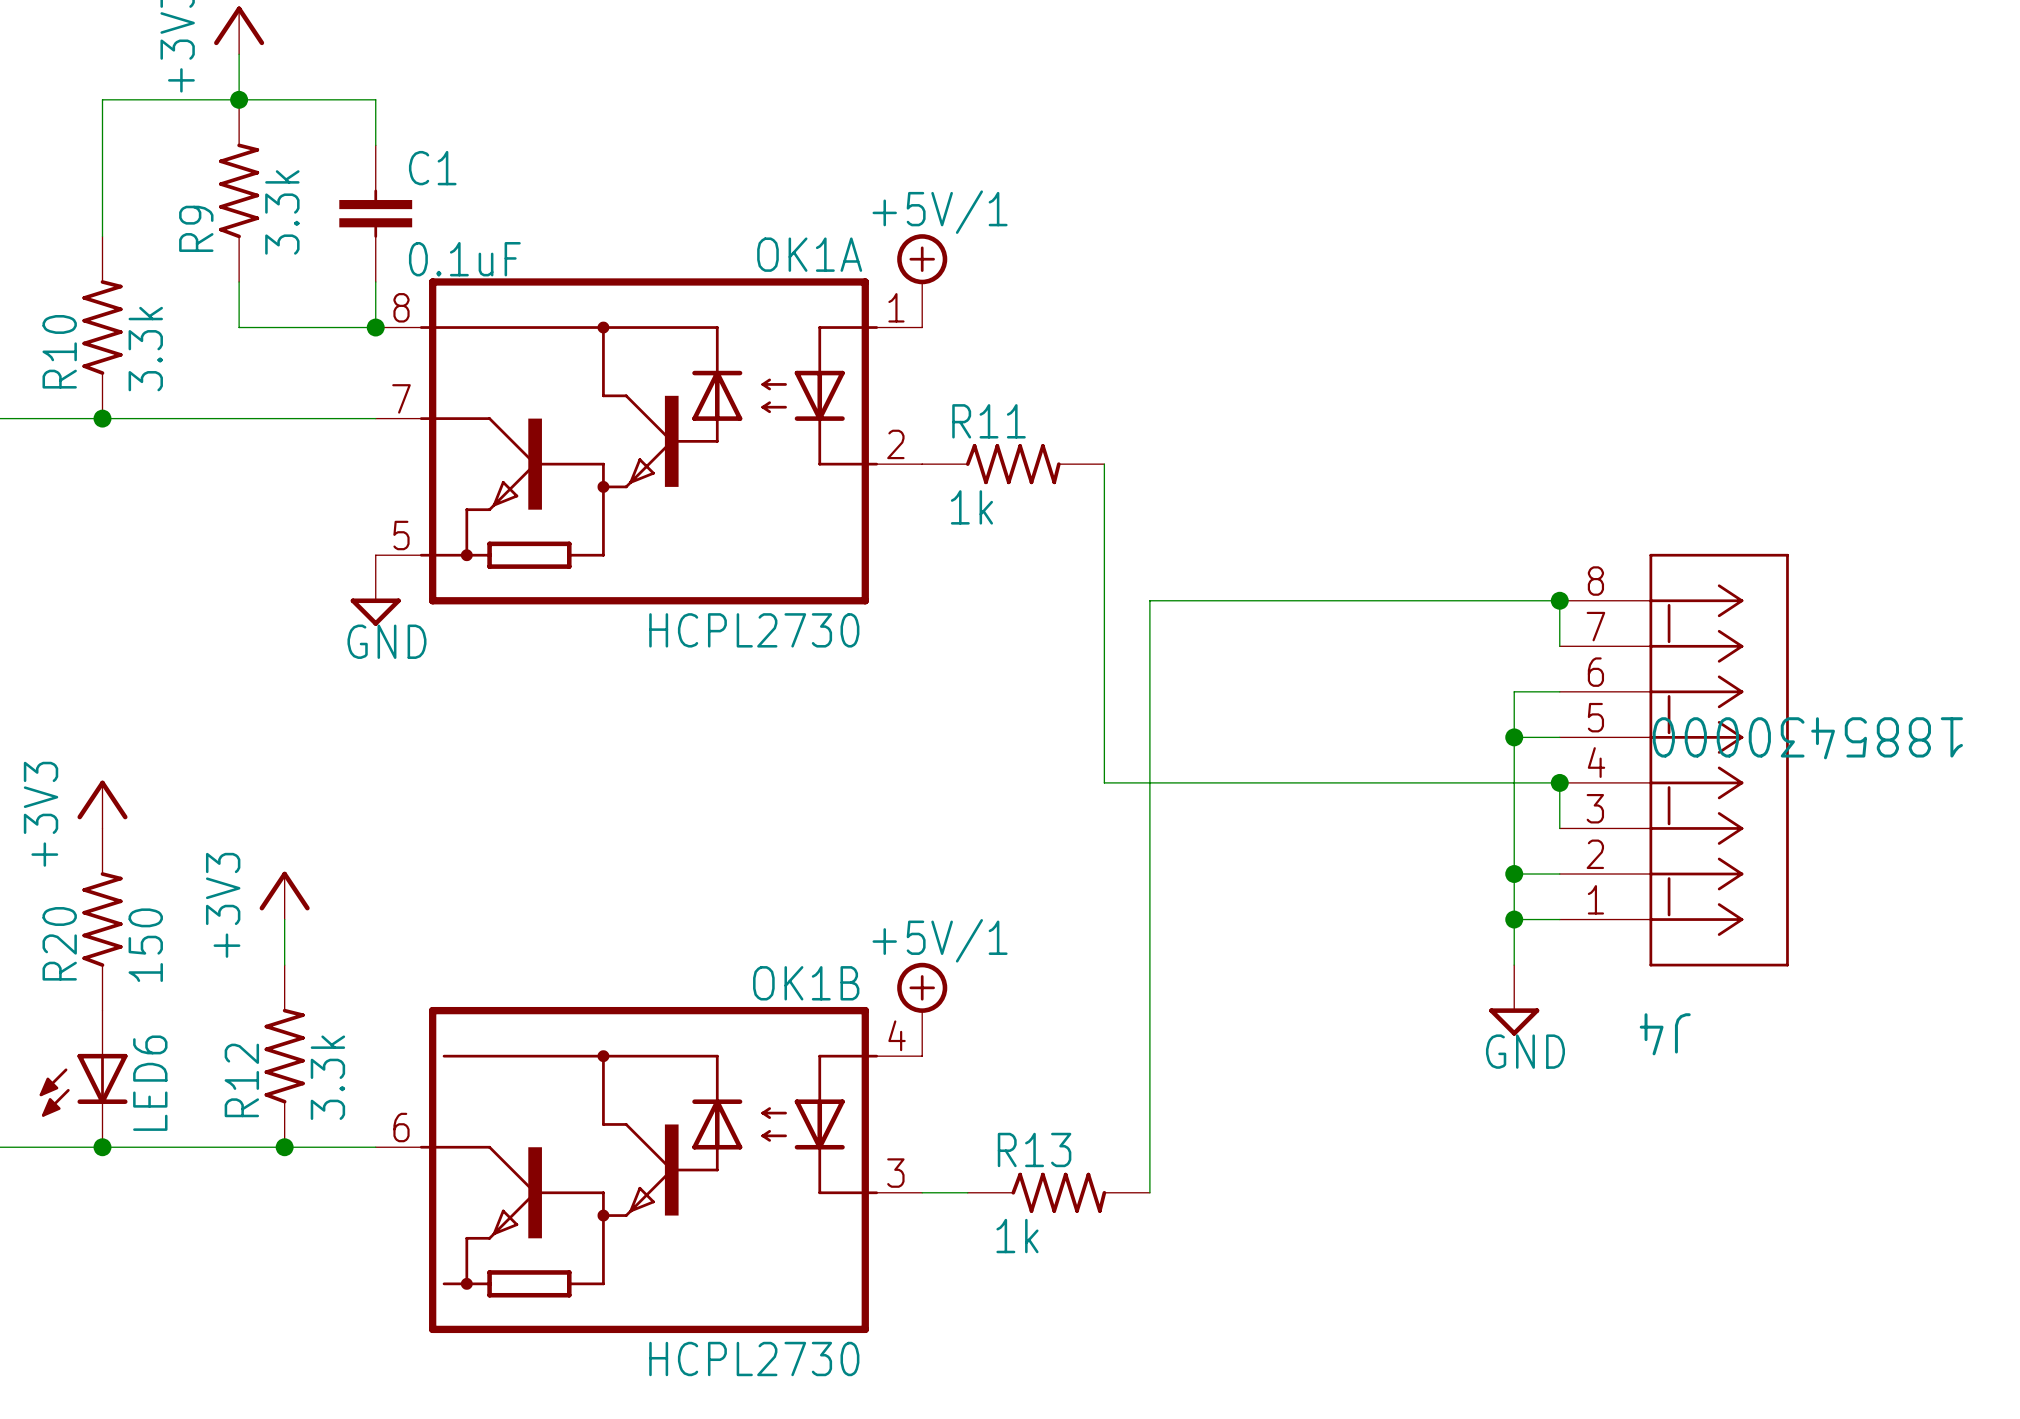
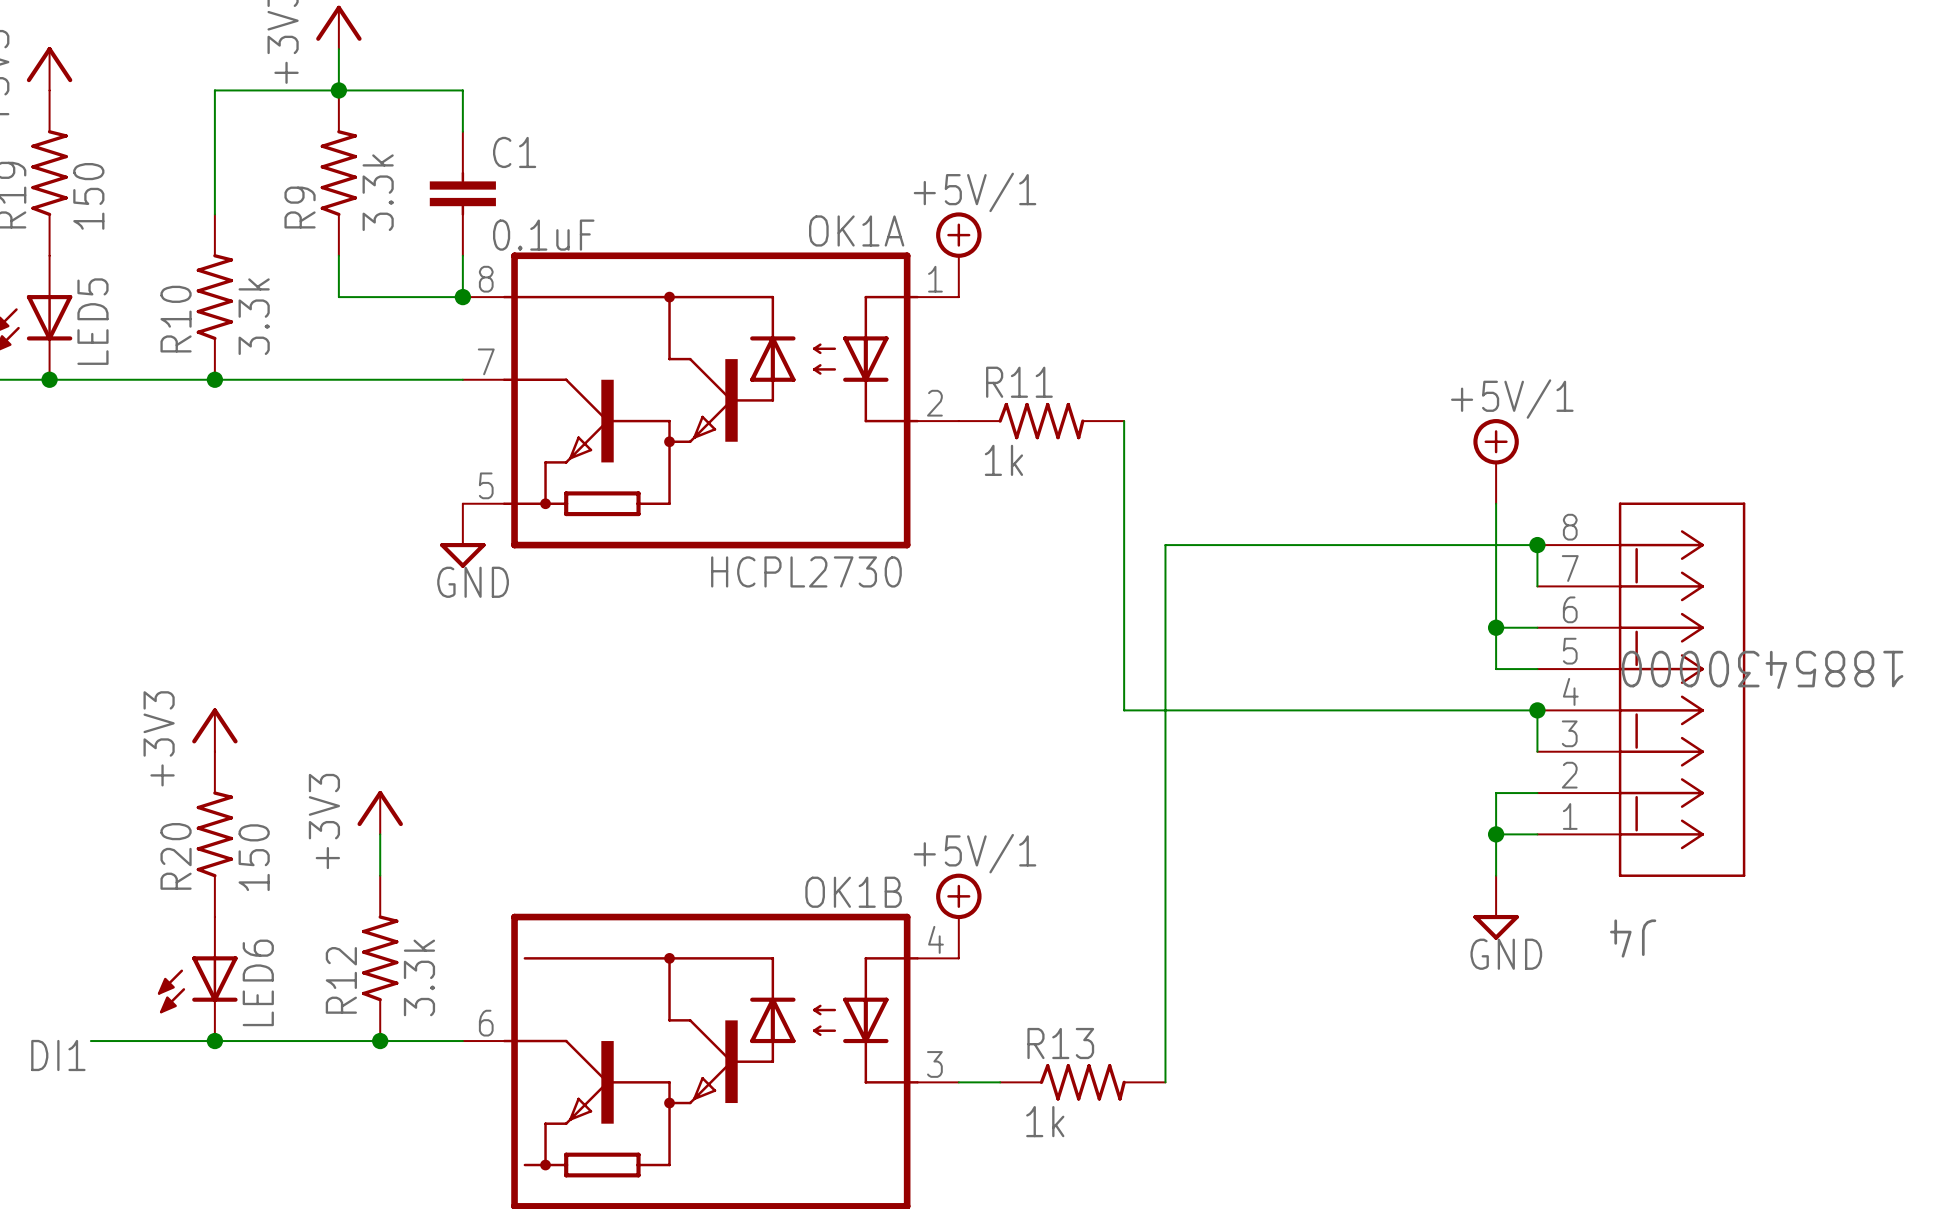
power symbol: none -> +5V/1 (1496, 461)
wire: (1514, 737) (1514, 874) -> (1496, 503) (1496, 627)
junction position: (1514, 737) -> (1496, 627)
junction: (1514, 874) -> none

